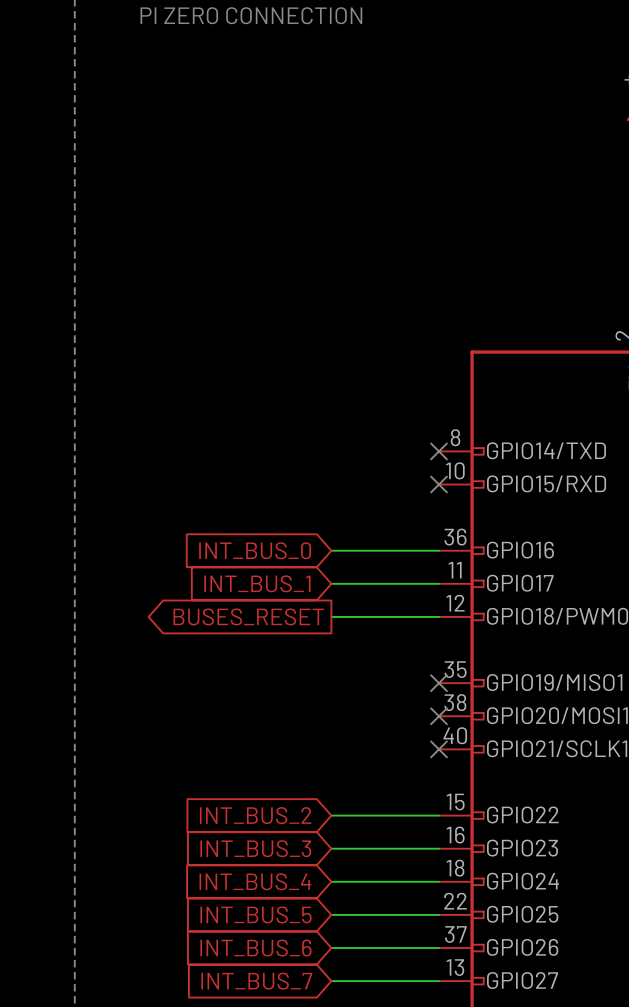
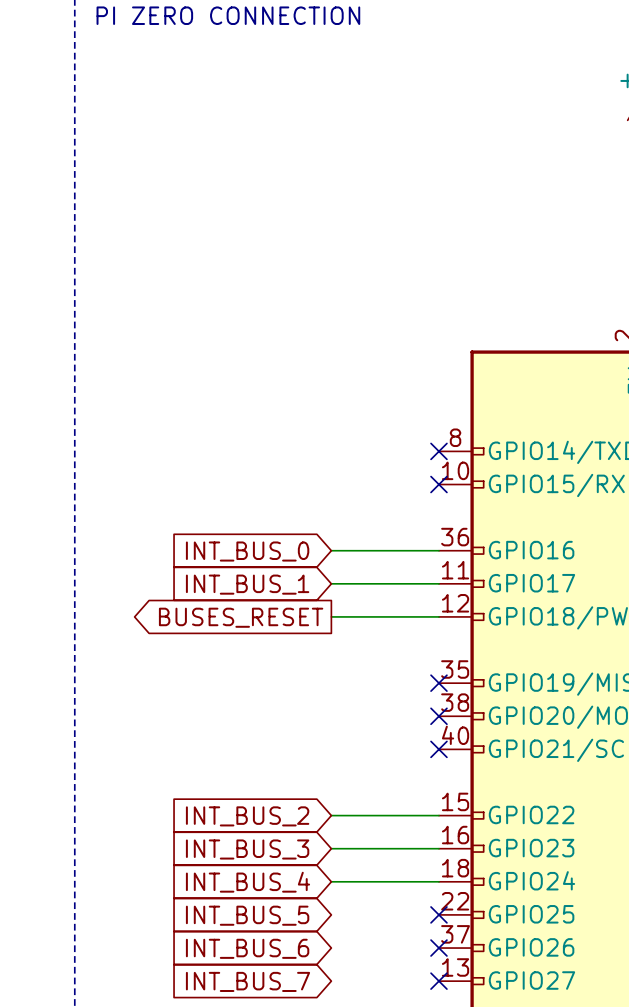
wire: (331, 914) (438, 914) -> none
no-connect mark: none -> (438, 914)
wire: (331, 948) (438, 948) -> none
no-connect mark: none -> (438, 948)
wire: (331, 981) (438, 981) -> none
no-connect mark: none -> (438, 981)

